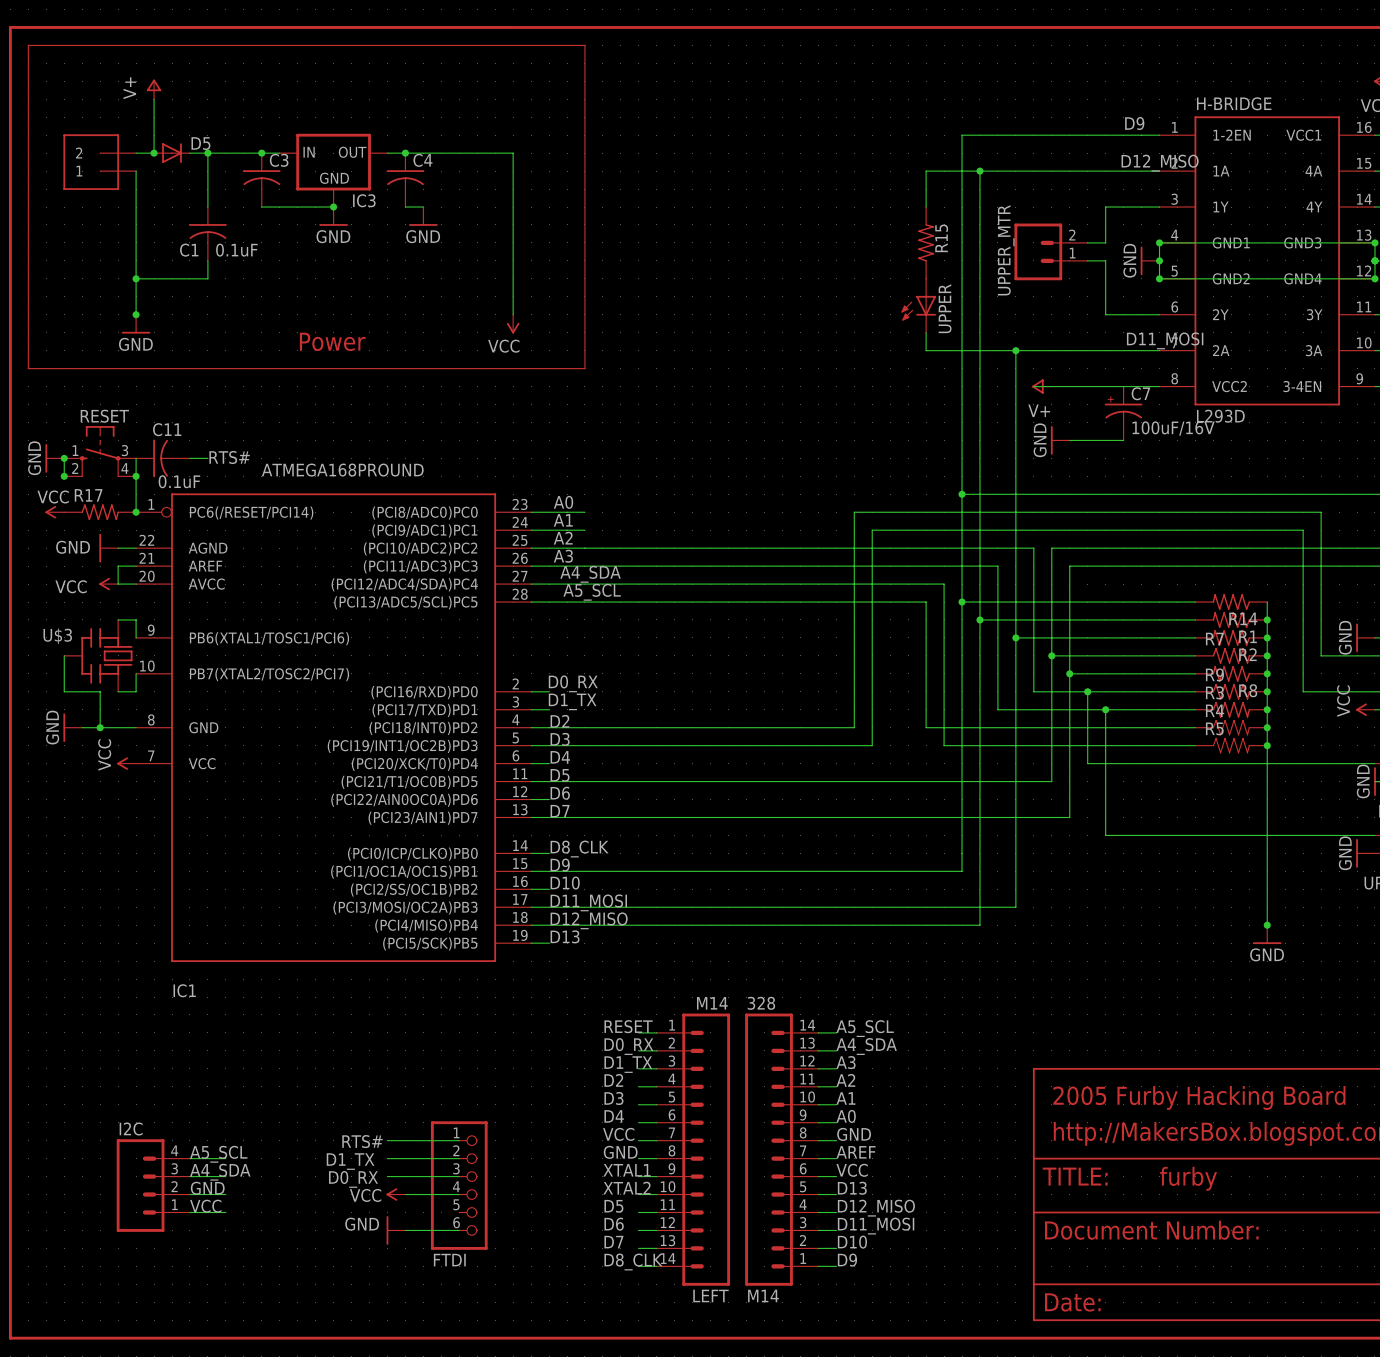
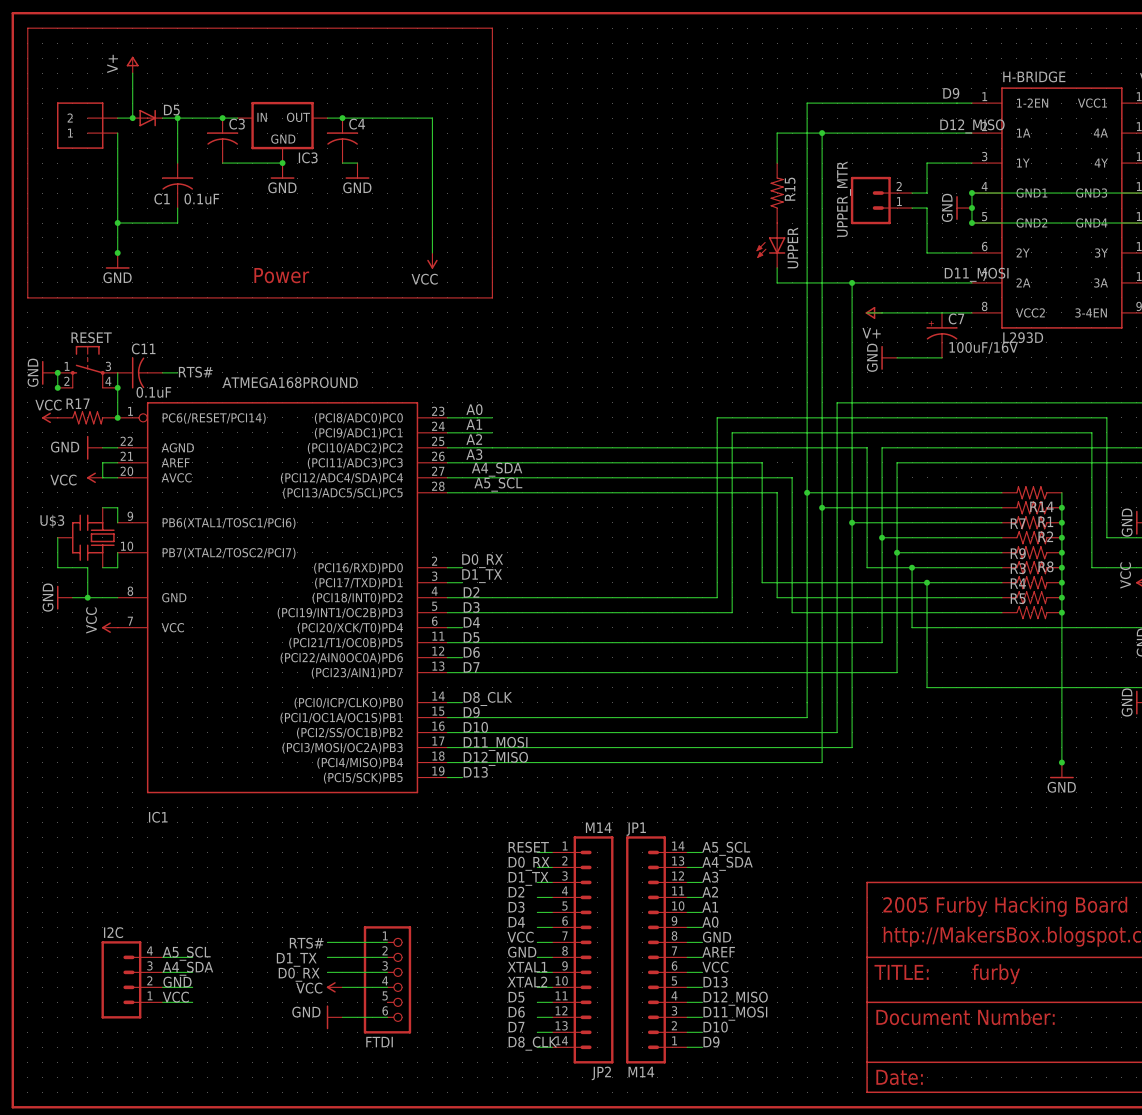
wire: (962, 494) (997, 494) -> (837, 462) (837, 402)
junction: (962, 494) -> none
wire: (908, 566) (997, 566) -> (762, 462) (762, 582) (837, 582) (837, 732) (462, 732)
328 name: 328 (761, 1003) -> JP1 (636, 829)
LEFT name: LEFT (710, 1295) -> JP2 (601, 1073)

